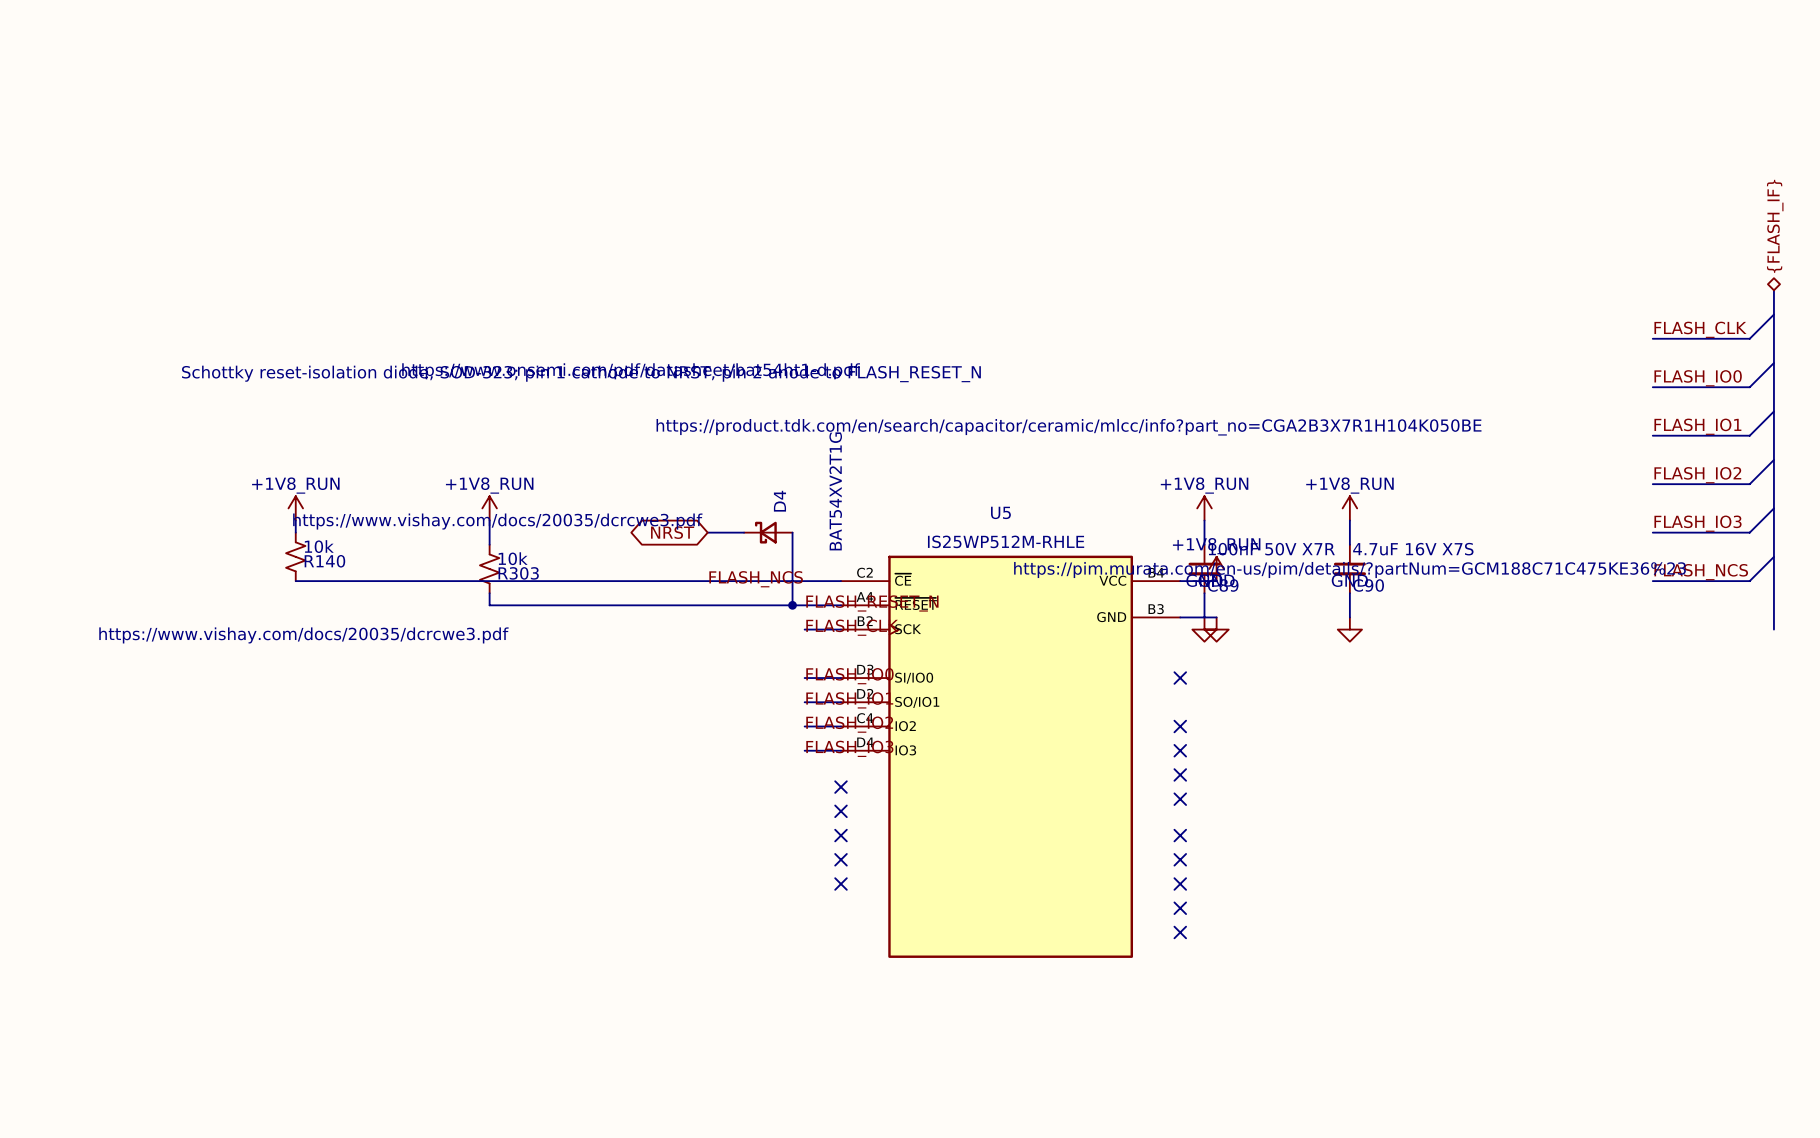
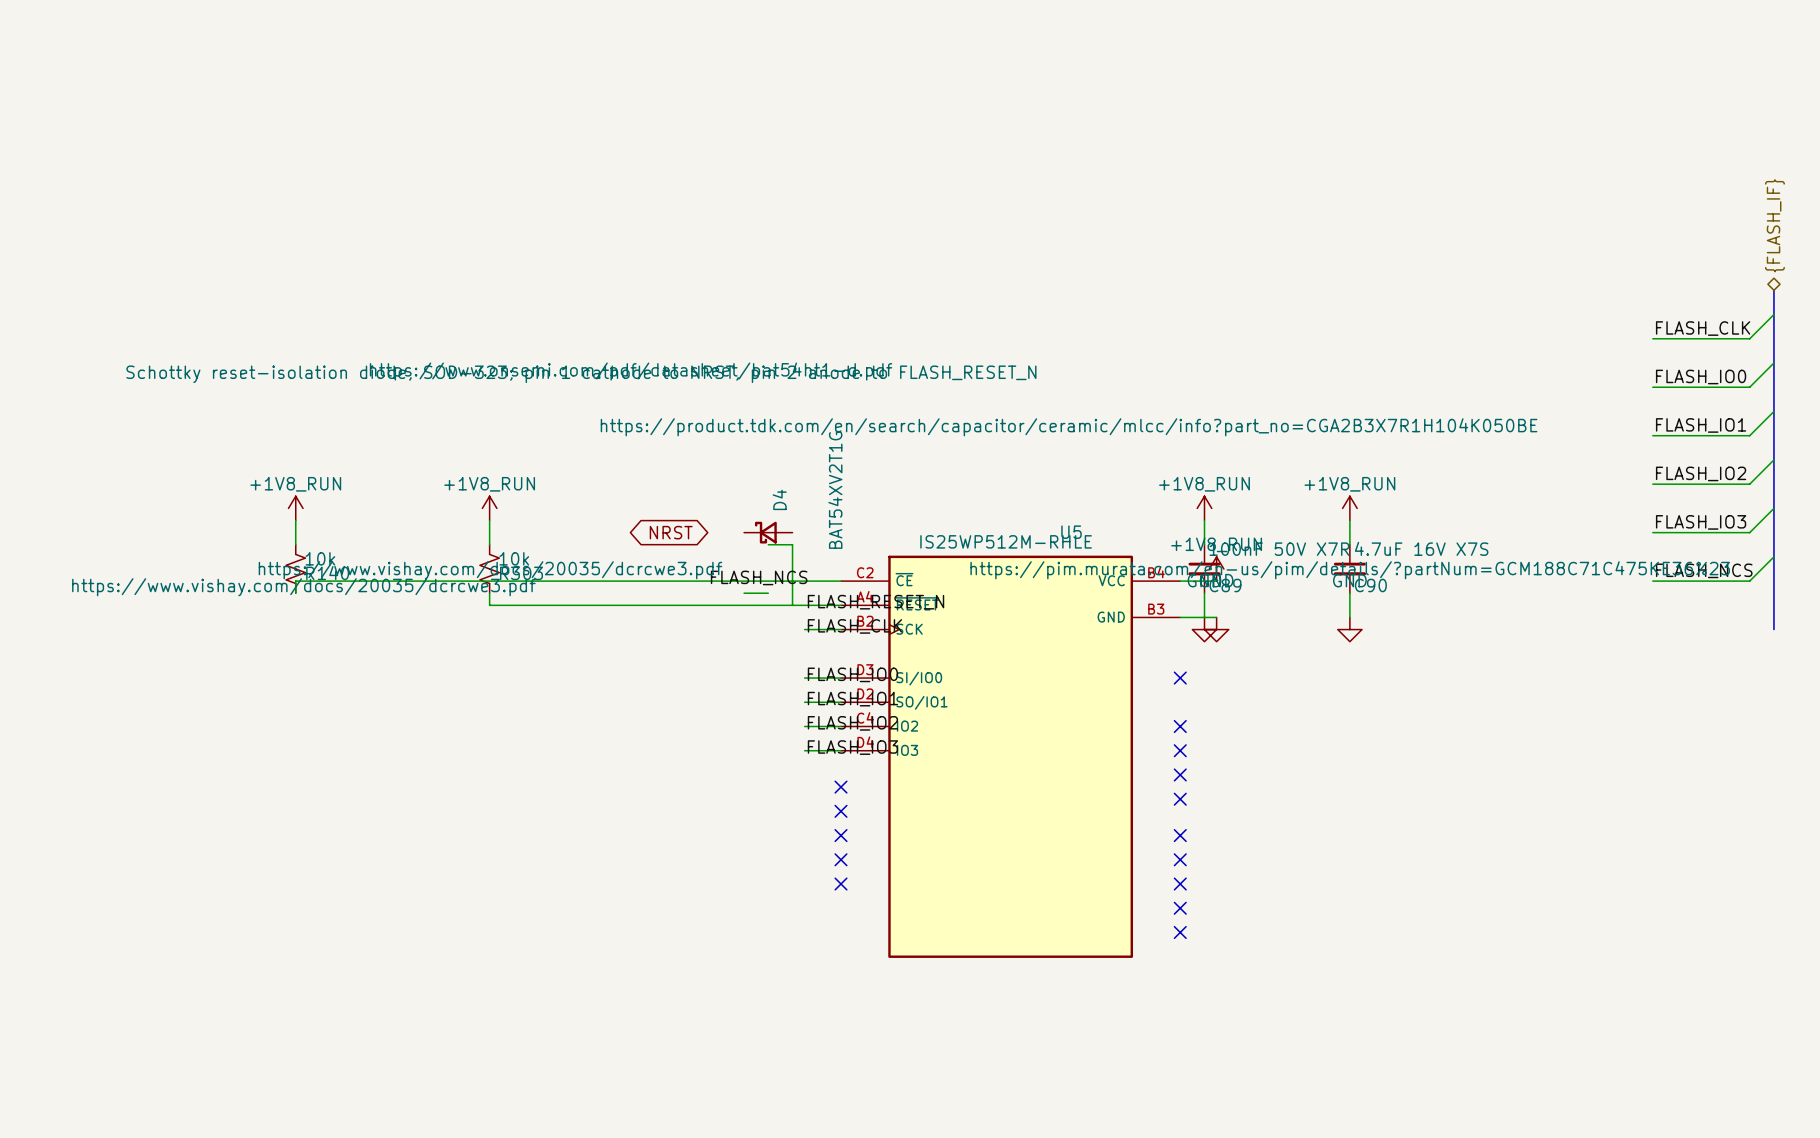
U5 name position: U5 (1000, 512) -> U5 (1071, 532)
R303 text position: https://www.vishay.com/docs/20035/dcrcwe3.pdf (497, 521) -> https://www.vishay.com/docs/20035/dcrcwe3.pdf (490, 570)
wire: (707, 532) (744, 532) -> none
wire: (792, 532) (792, 544) -> (768, 544) (792, 544)
R140 position: (295, 556) -> (295, 568)
wire: none -> (295, 581) (295, 593)
wire: none -> (744, 593) (768, 593)
junction: (792, 605) -> none
R140 text position: https://www.vishay.com/docs/20035/dcrcwe3.pdf (303, 635) -> https://www.vishay.com/docs/20035/dcrcwe3.pdf (303, 587)

